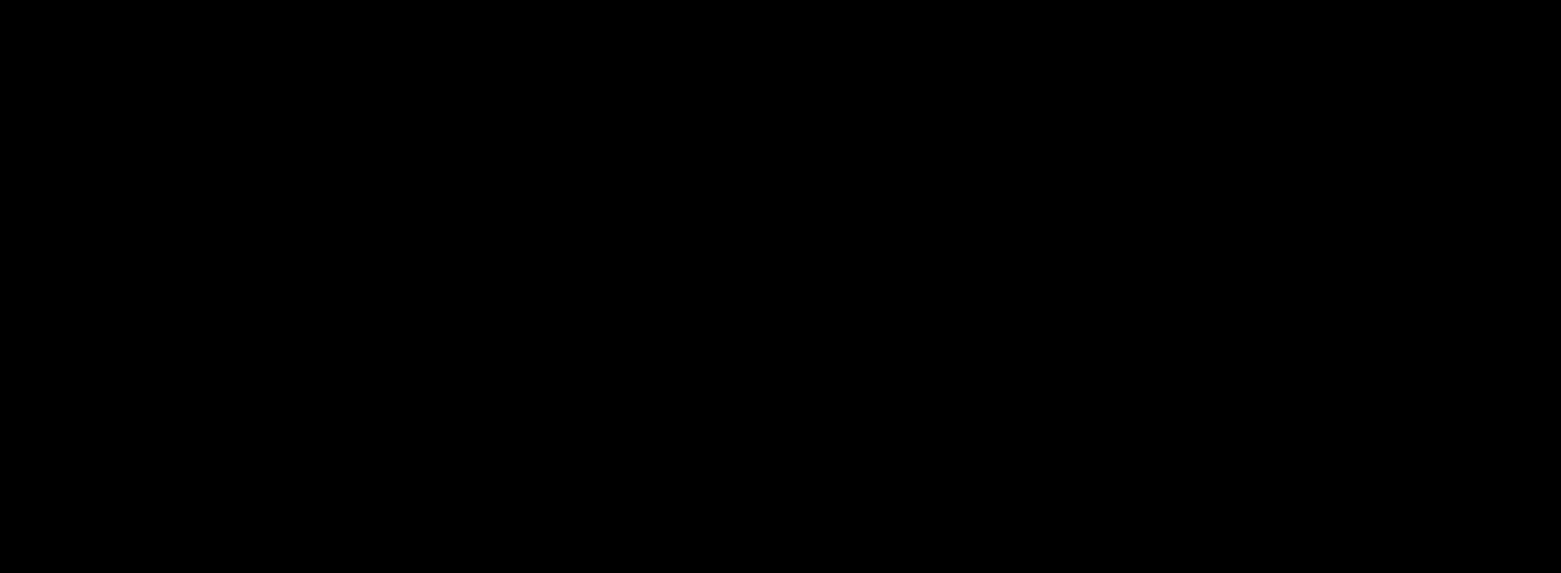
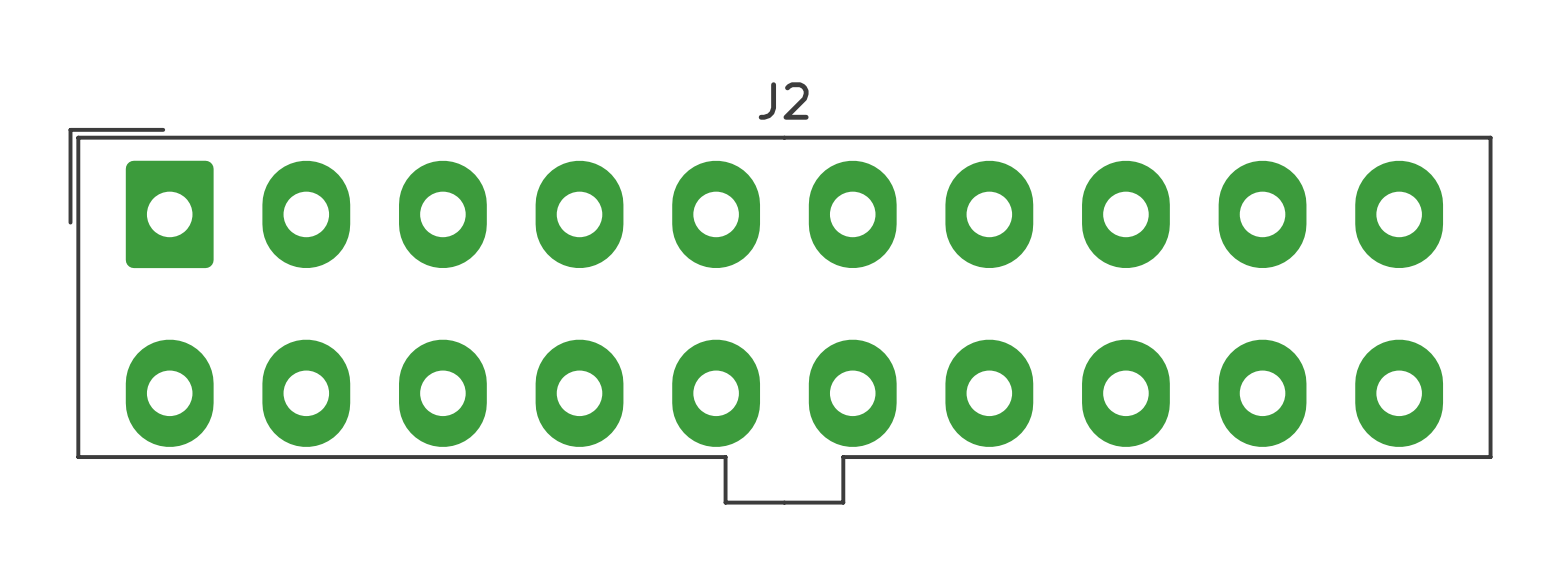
J2: none -> (780, 316)

